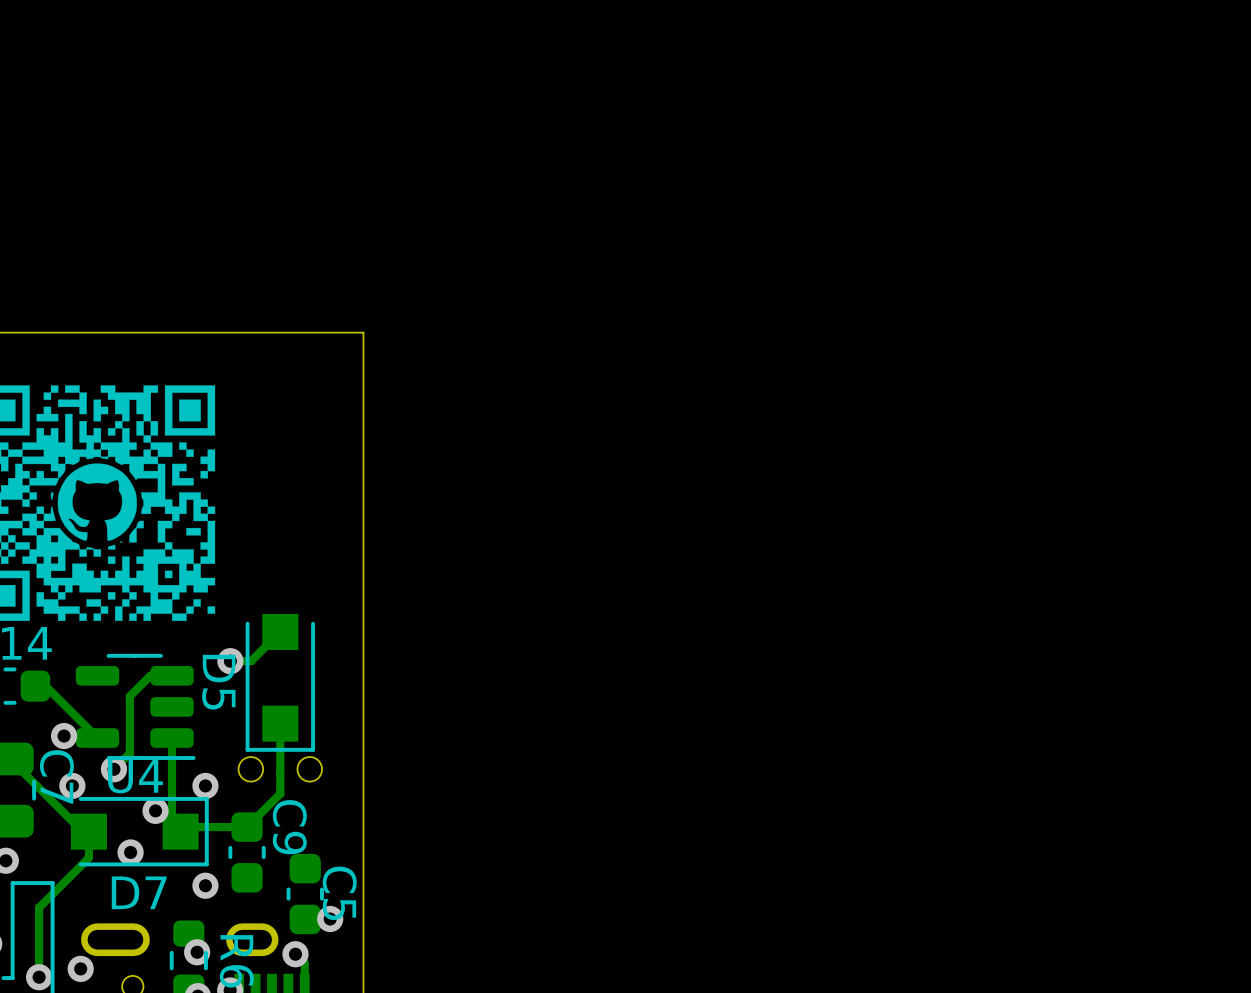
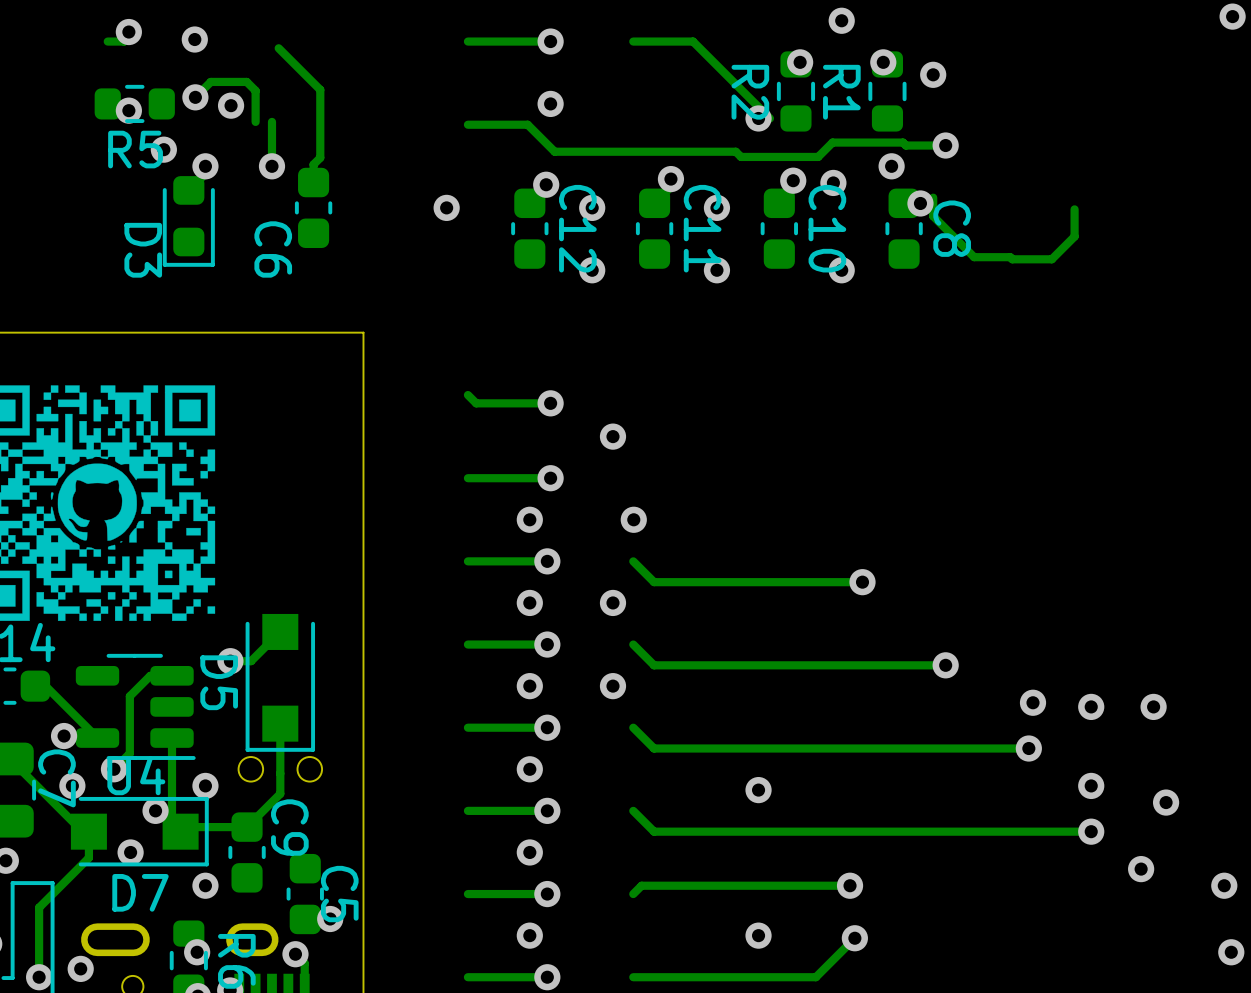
via: none -> (1232, 16)
via: none -> (841, 20)
track: none -> (128, 32) (128, 36) (124, 41) (107, 41)
via: none -> (128, 32)
via: none -> (194, 39)
track: none -> (550, 41) (467, 41)
via: none -> (550, 41)
track: none -> (633, 41) (693, 41) (769, 118)
track: none -> (278, 48) (320, 89) (320, 157) (313, 164) (313, 182)
via: none -> (800, 62)
via: none -> (883, 62)
via: none -> (933, 74)
R2: none -> (795, 91)
R1: none -> (887, 91)
track: none -> (195, 97) (210, 81) (246, 81) (255, 90) (255, 121)
via: none -> (195, 97)
R5: none -> (134, 103)
via: none -> (550, 103)
via: none -> (231, 105)
via: none -> (128, 110)
via: none -> (758, 118)
track: none -> (271, 121) (271, 166)
track: none -> (467, 124) (527, 124) (554, 151) (735, 151) (741, 156) (818, 156) (832, 142) (903, 142) (905, 145) (945, 145)
via: none -> (945, 145)
via: none -> (163, 149)
via: none -> (205, 166)
via: none -> (271, 166)
via: none -> (891, 166)
via: none -> (670, 179)
via: none -> (793, 180)
via: none -> (833, 182)
via: none -> (546, 184)
track: none -> (933, 197) (933, 216) (974, 257) (1051, 259) (1074, 236) (1074, 209)
via: none -> (920, 203)
C6: none -> (313, 207)
via: none -> (446, 207)
via: none -> (592, 207)
via: none -> (716, 207)
D3: none -> (188, 221)
C12: none -> (529, 228)
C11: none -> (654, 228)
C10: none -> (779, 228)
C8: none -> (904, 228)
via: none -> (592, 270)
via: none -> (716, 270)
via: none -> (841, 270)
track: none -> (467, 395) (476, 403) (550, 403)
via: none -> (550, 403)
via: none -> (612, 436)
track: none -> (550, 478) (467, 478)
via: none -> (550, 478)
via: none -> (529, 519)
via: none -> (633, 519)
track: none -> (547, 561) (467, 561)
via: none -> (547, 561)
track: none -> (633, 561) (654, 582) (862, 582)
via: none -> (862, 582)
via: none -> (529, 602)
via: none -> (612, 602)
track: none -> (547, 644) (467, 644)
via: none -> (547, 644)
track: none -> (633, 644) (654, 665) (945, 665)
via: none -> (945, 665)
via: none -> (529, 686)
via: none -> (612, 686)
via: none -> (1033, 702)
via: none -> (1091, 706)
via: none -> (1153, 706)
track: none -> (547, 727) (467, 727)
via: none -> (547, 727)
track: none -> (633, 727) (654, 748) (1028, 748)
via: none -> (1028, 748)
via: none -> (529, 769)
via: none -> (1091, 785)
via: none -> (758, 790)
via: none -> (1166, 802)
track: none -> (547, 810) (467, 810)
via: none -> (547, 810)
track: none -> (633, 810) (654, 831) (1091, 831)
via: none -> (1091, 831)
via: none -> (529, 852)
via: none -> (1141, 869)
track: none -> (850, 885) (641, 885) (633, 894)
via: none -> (850, 885)
via: none -> (1224, 885)
track: none -> (547, 894) (467, 894)
via: none -> (547, 894)
via: none -> (529, 935)
via: none -> (758, 935)
track: none -> (854, 938) (815, 977) (633, 977)
via: none -> (854, 938)
via: none -> (1231, 952)
track: none -> (547, 977) (467, 977)
via: none -> (547, 977)

